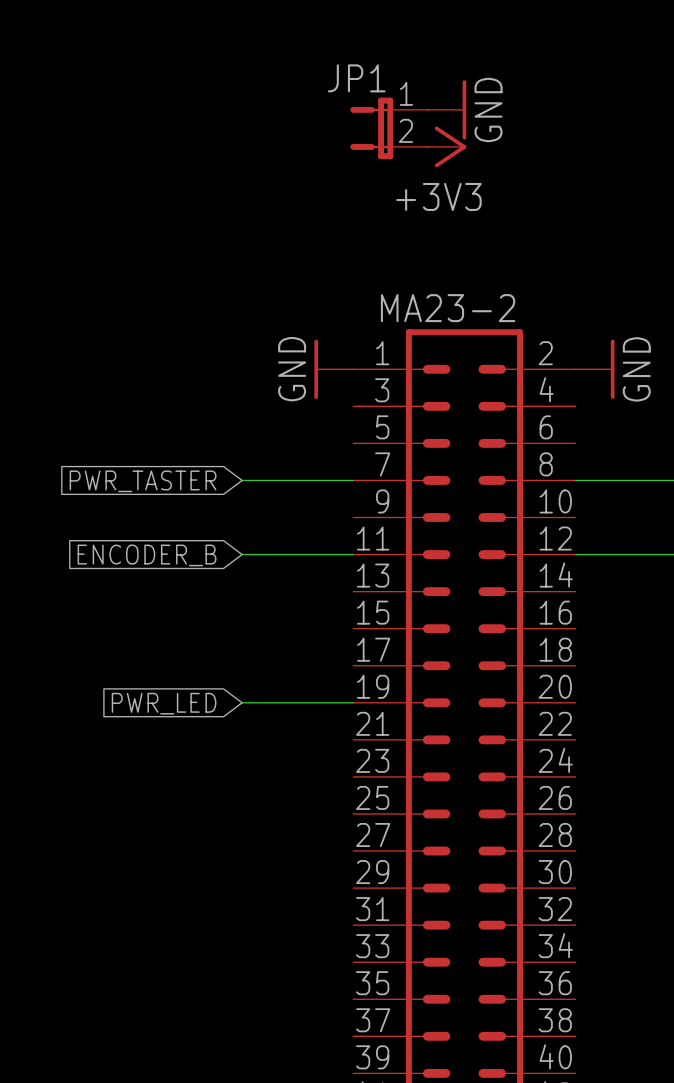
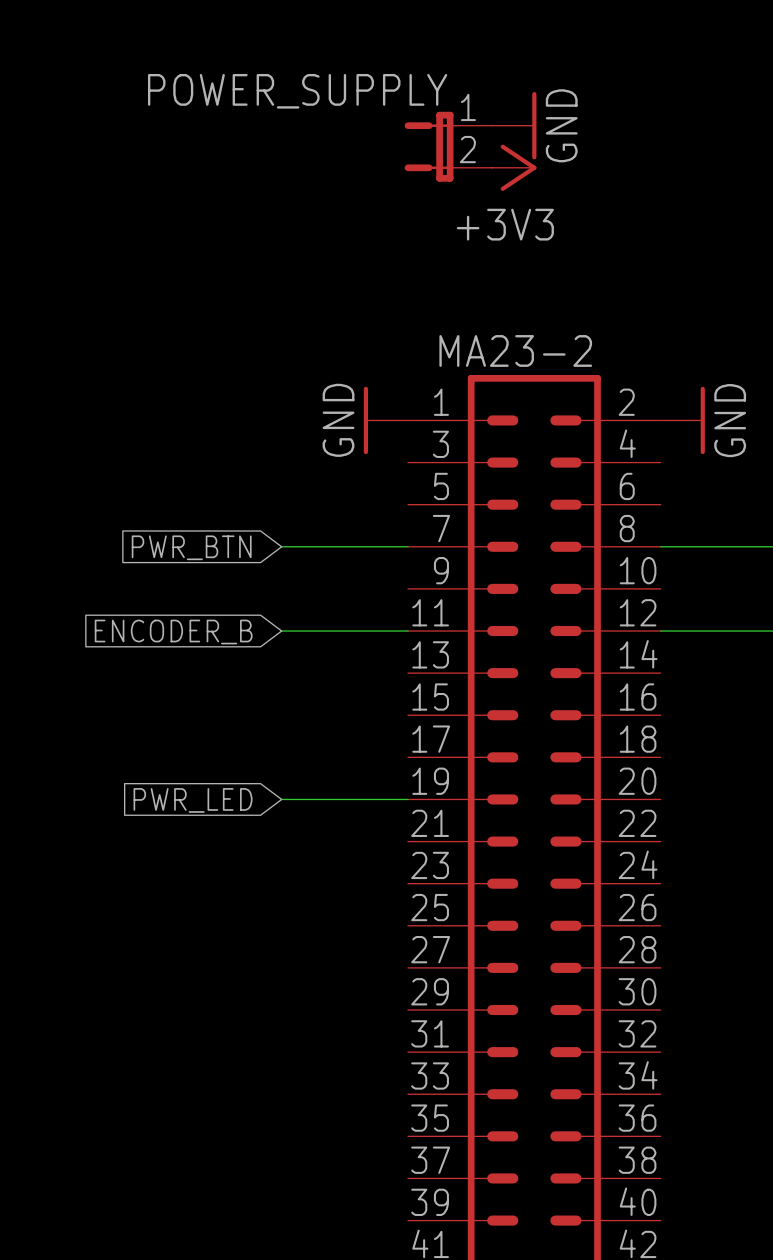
JP1 name: JP1 (356, 78) -> POWER_SUPPLY (297, 91)
global label: PWR_TASTER (143, 481) -> PWR_BTN (191, 547)

